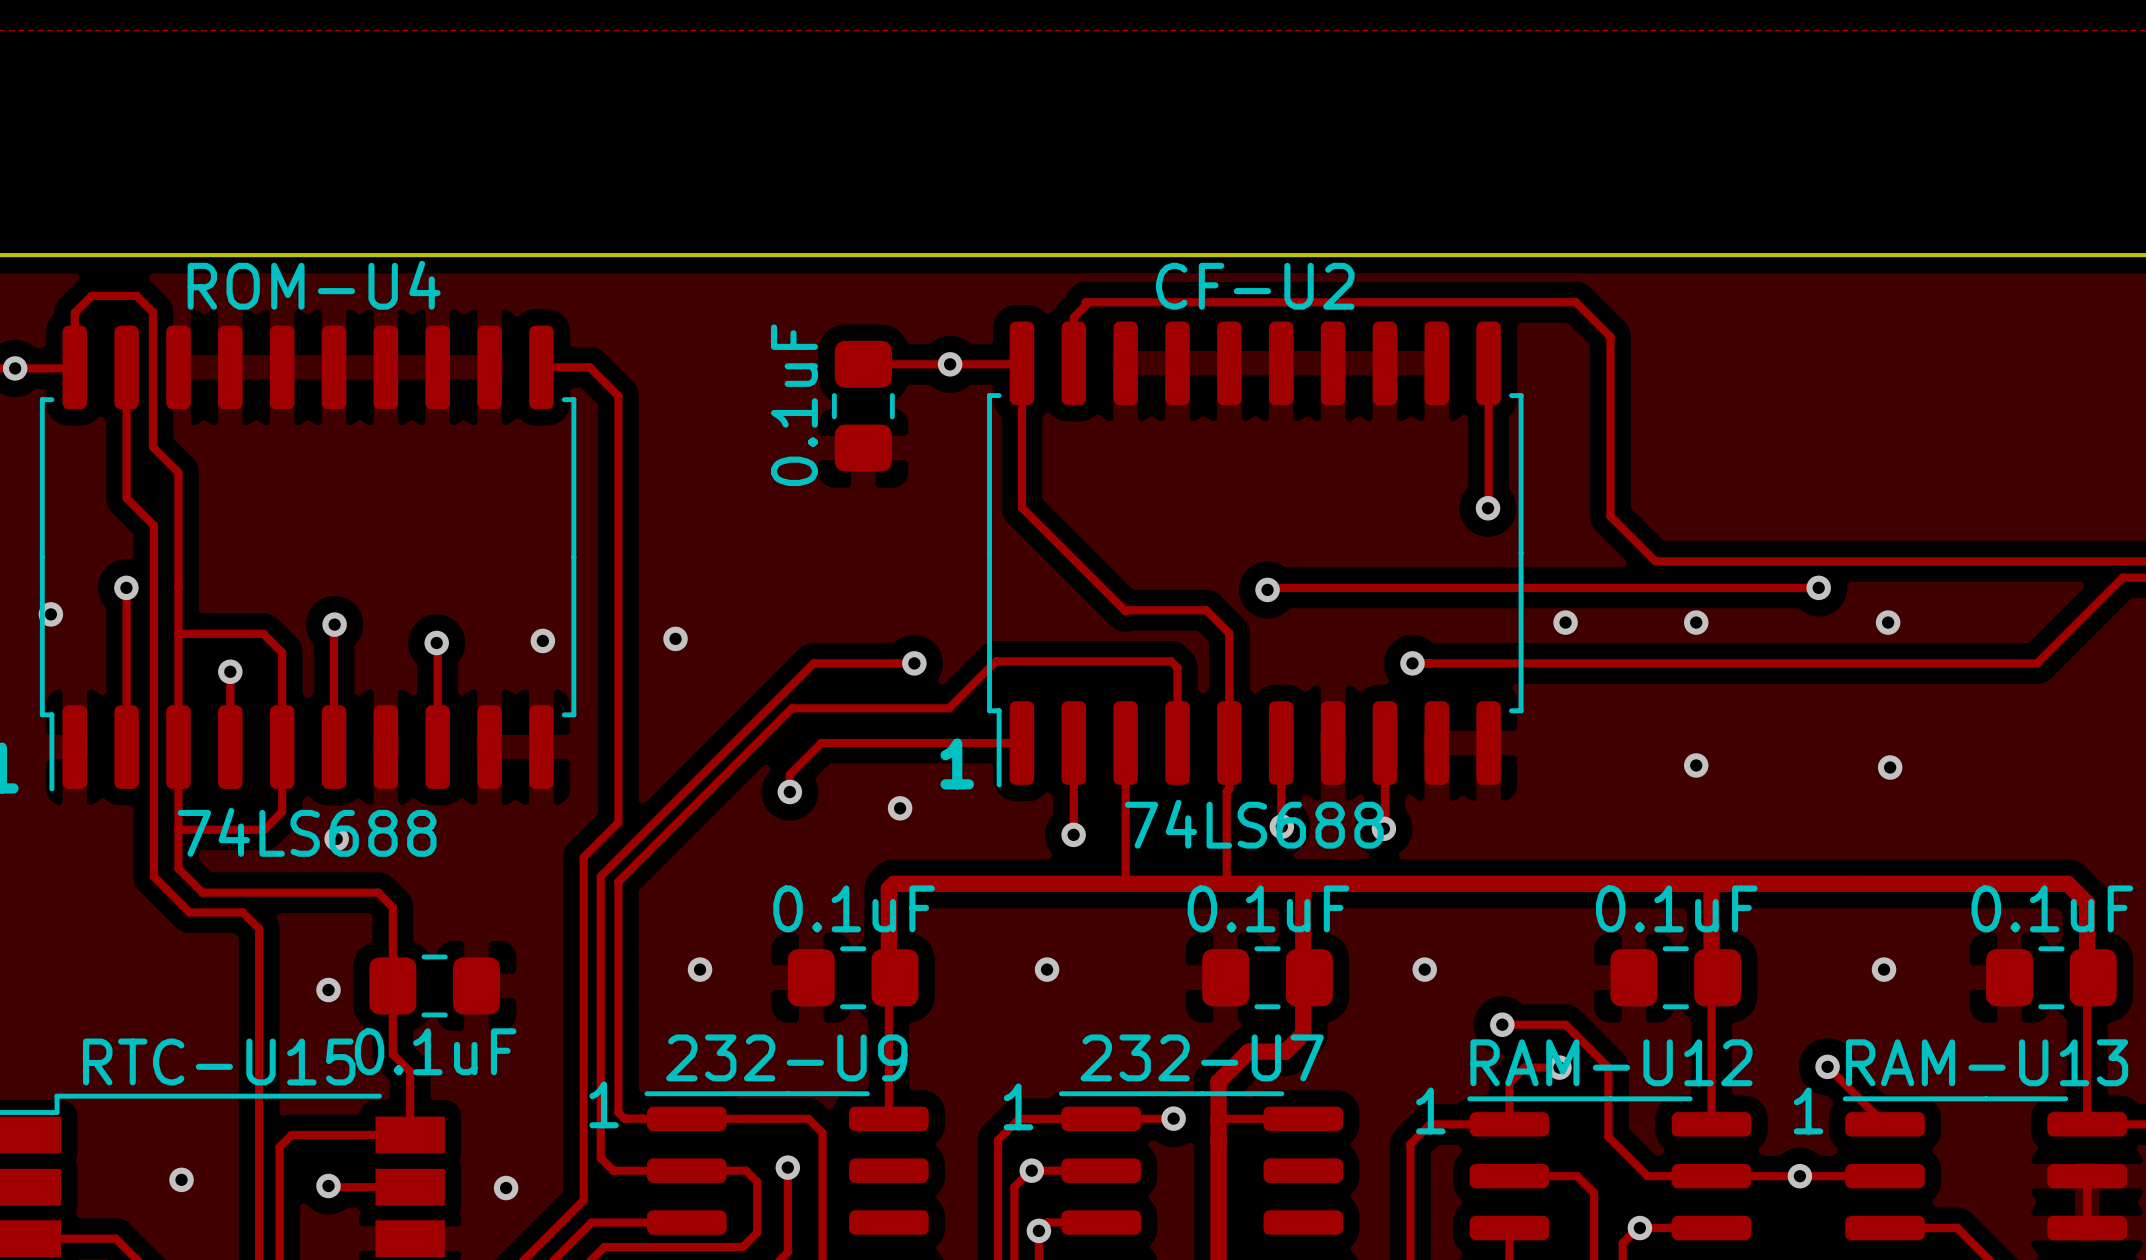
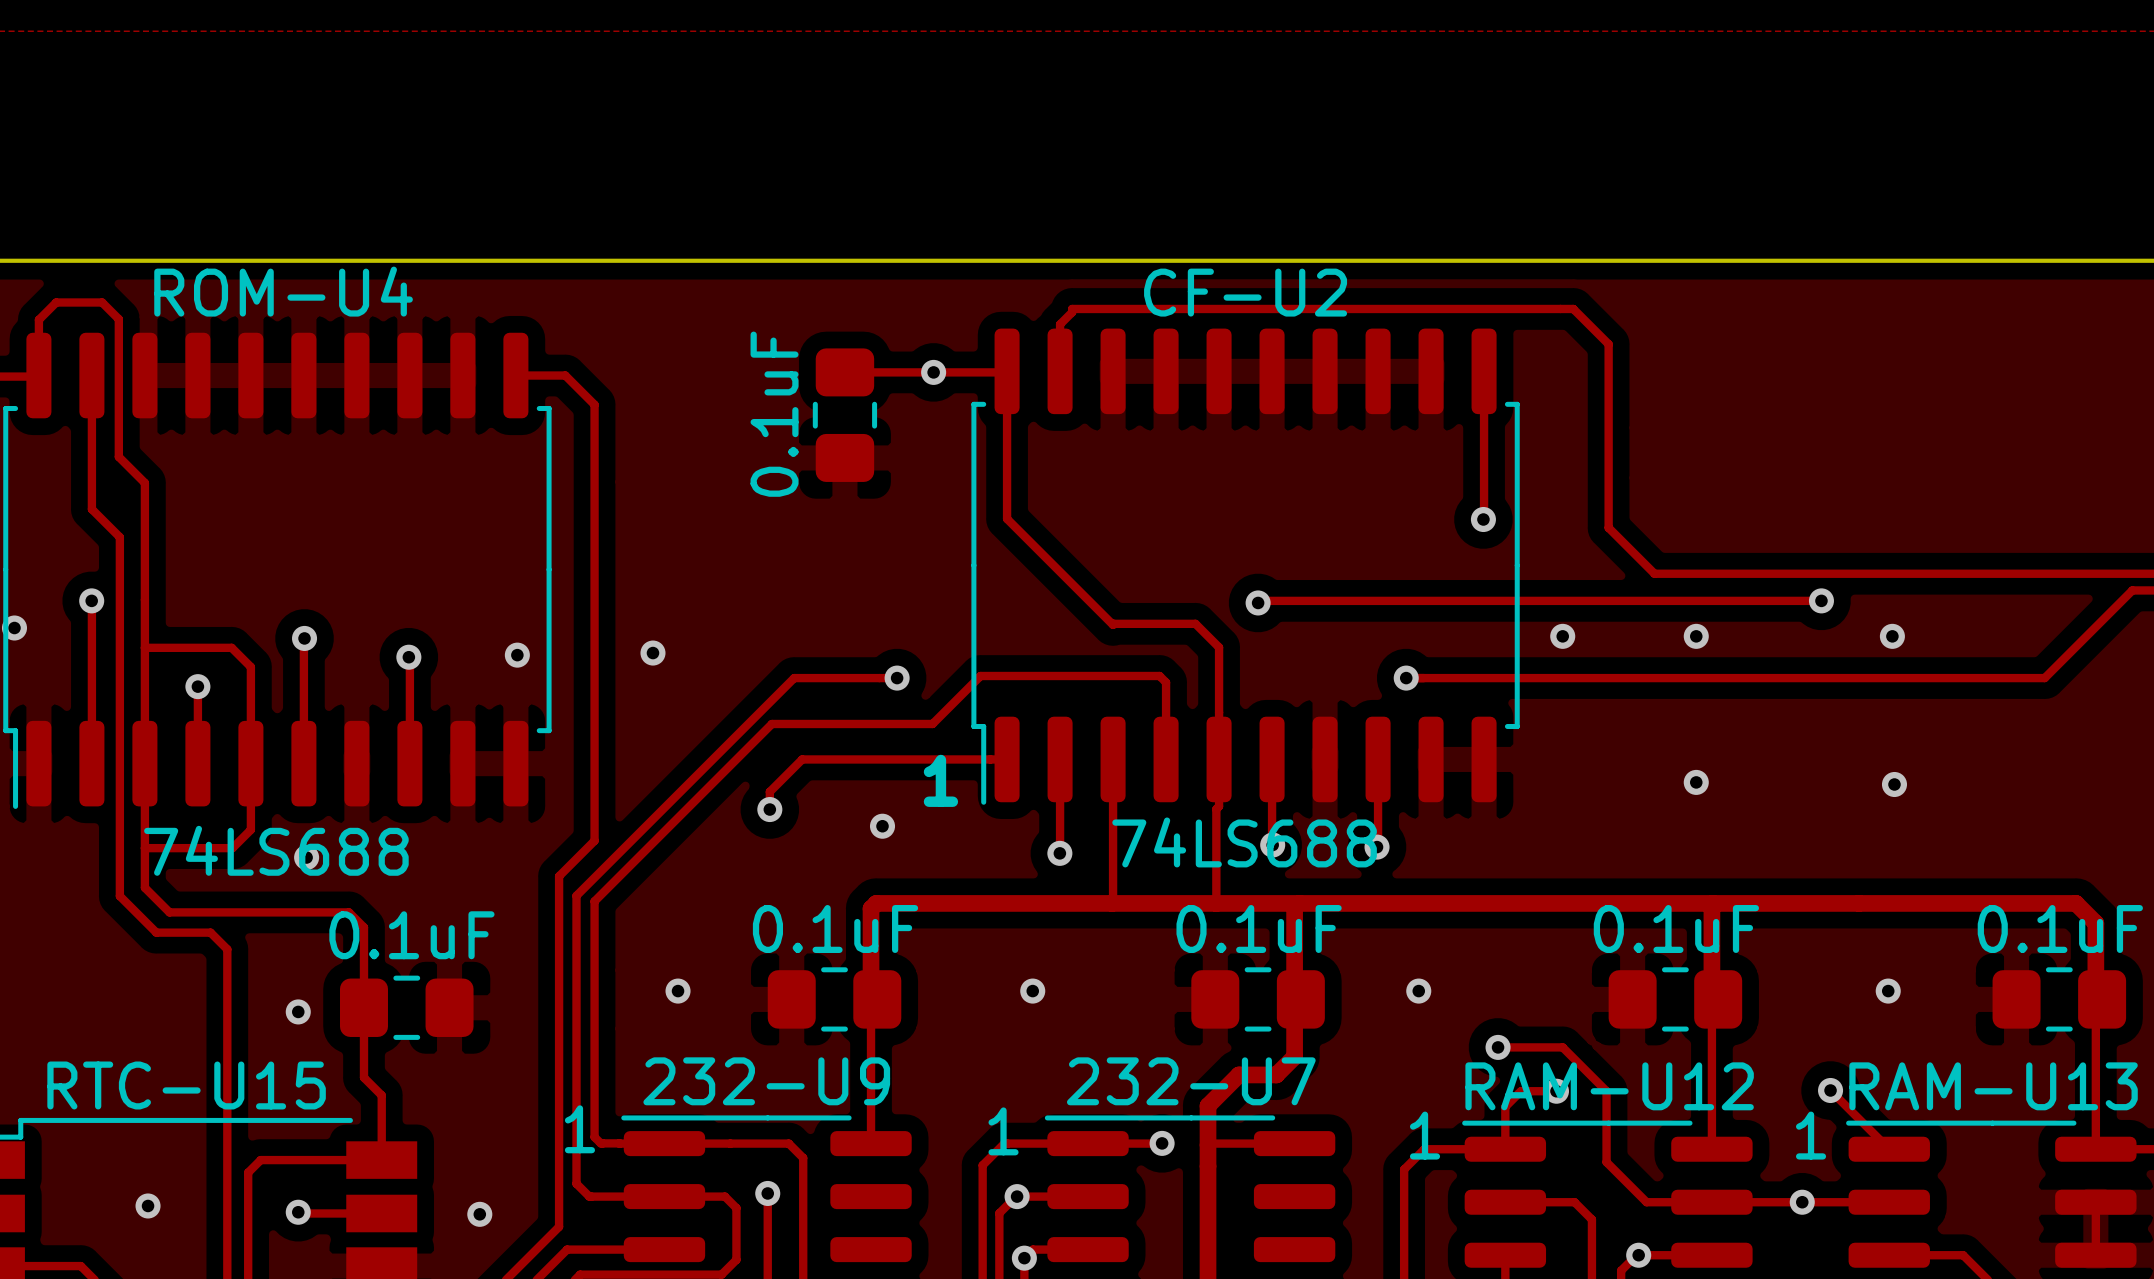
part value position: 0.1uF (435, 1051) -> 0.1uF (411, 935)

